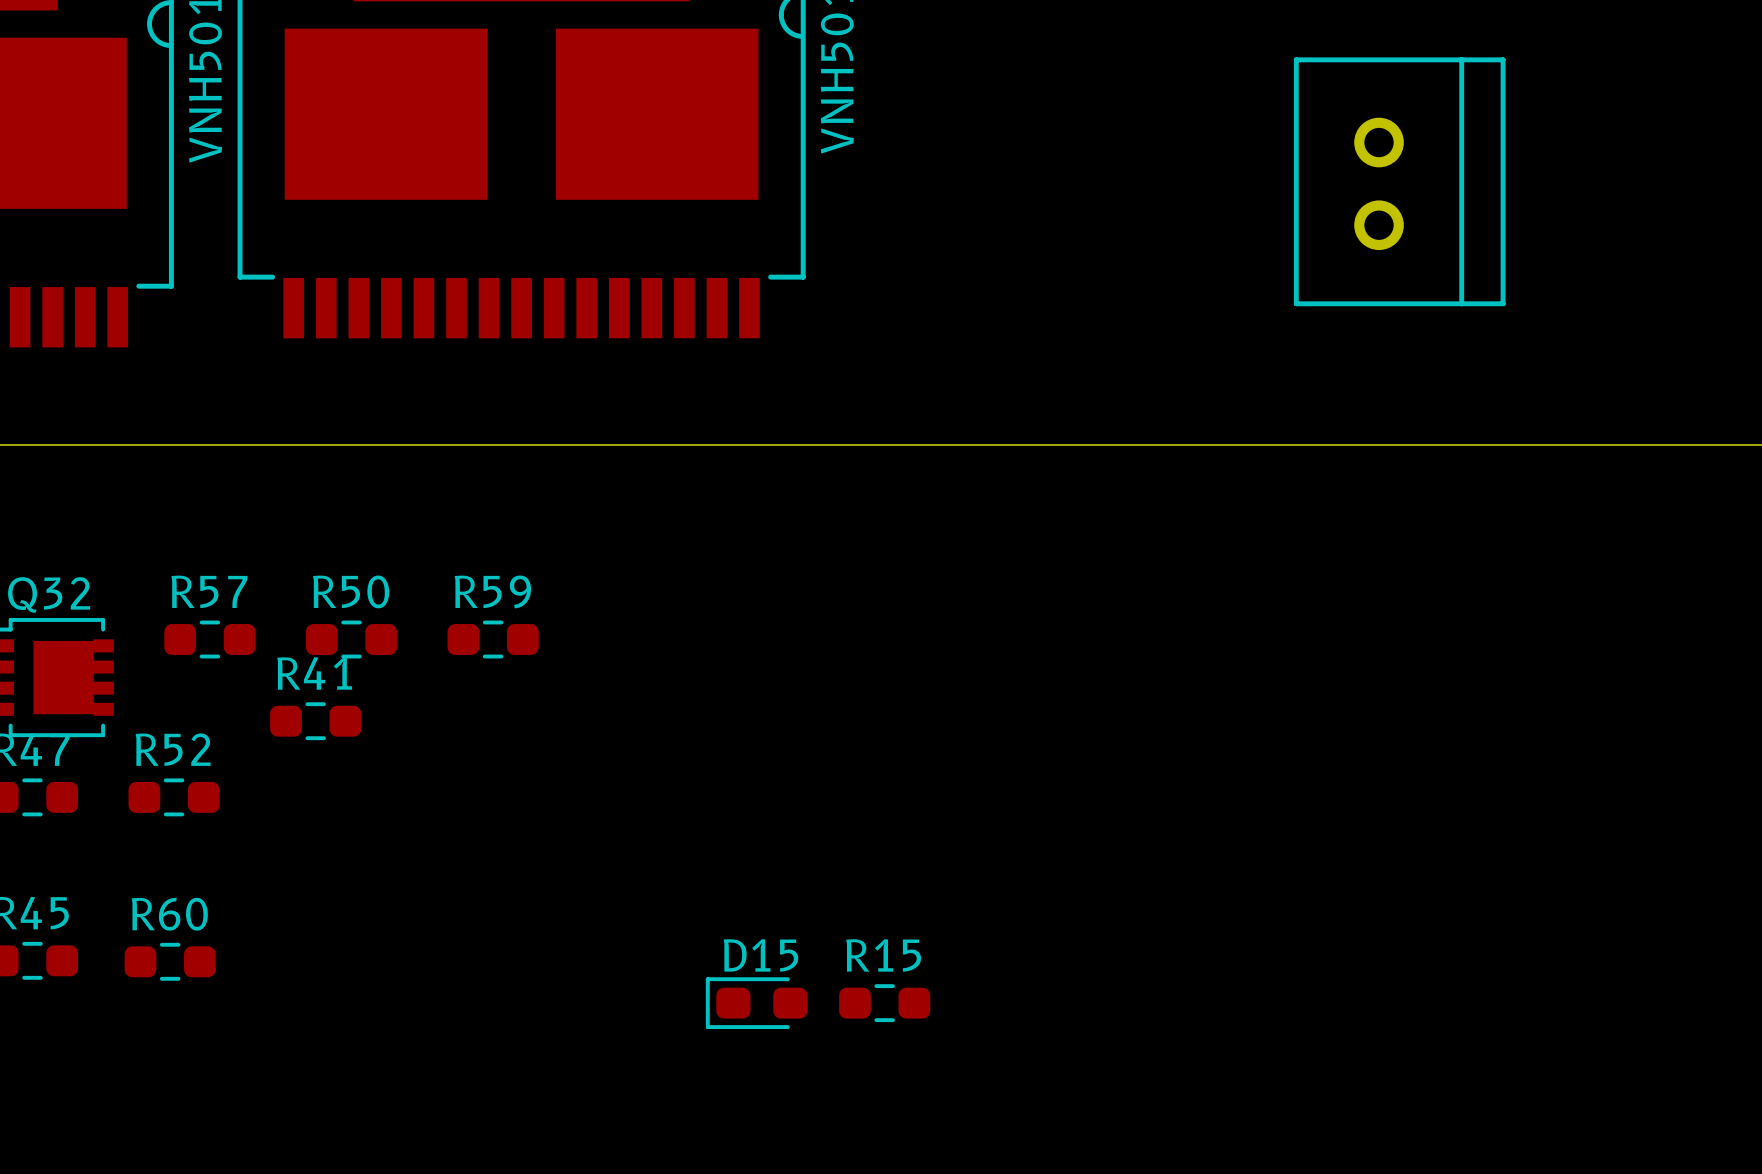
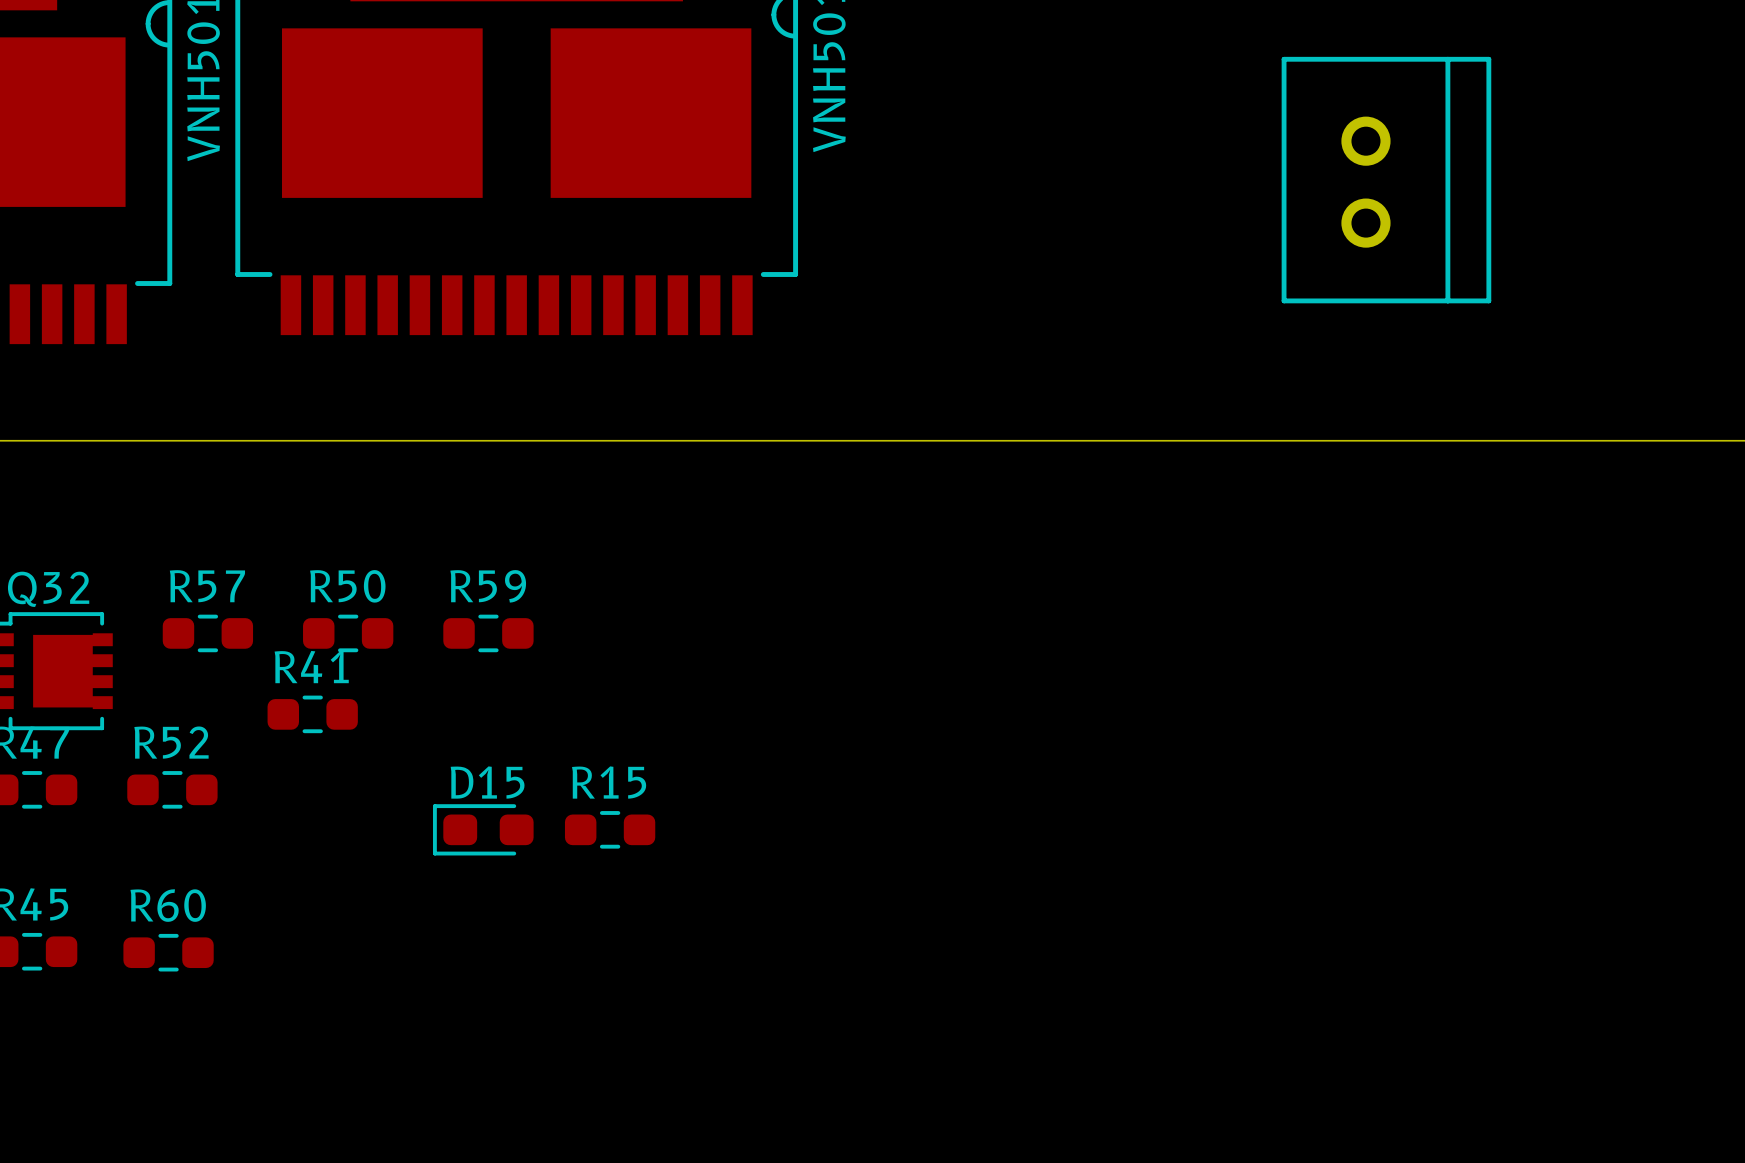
D15 position: (756, 1003) -> (483, 829)
R15 position: (884, 1003) -> (610, 829)

